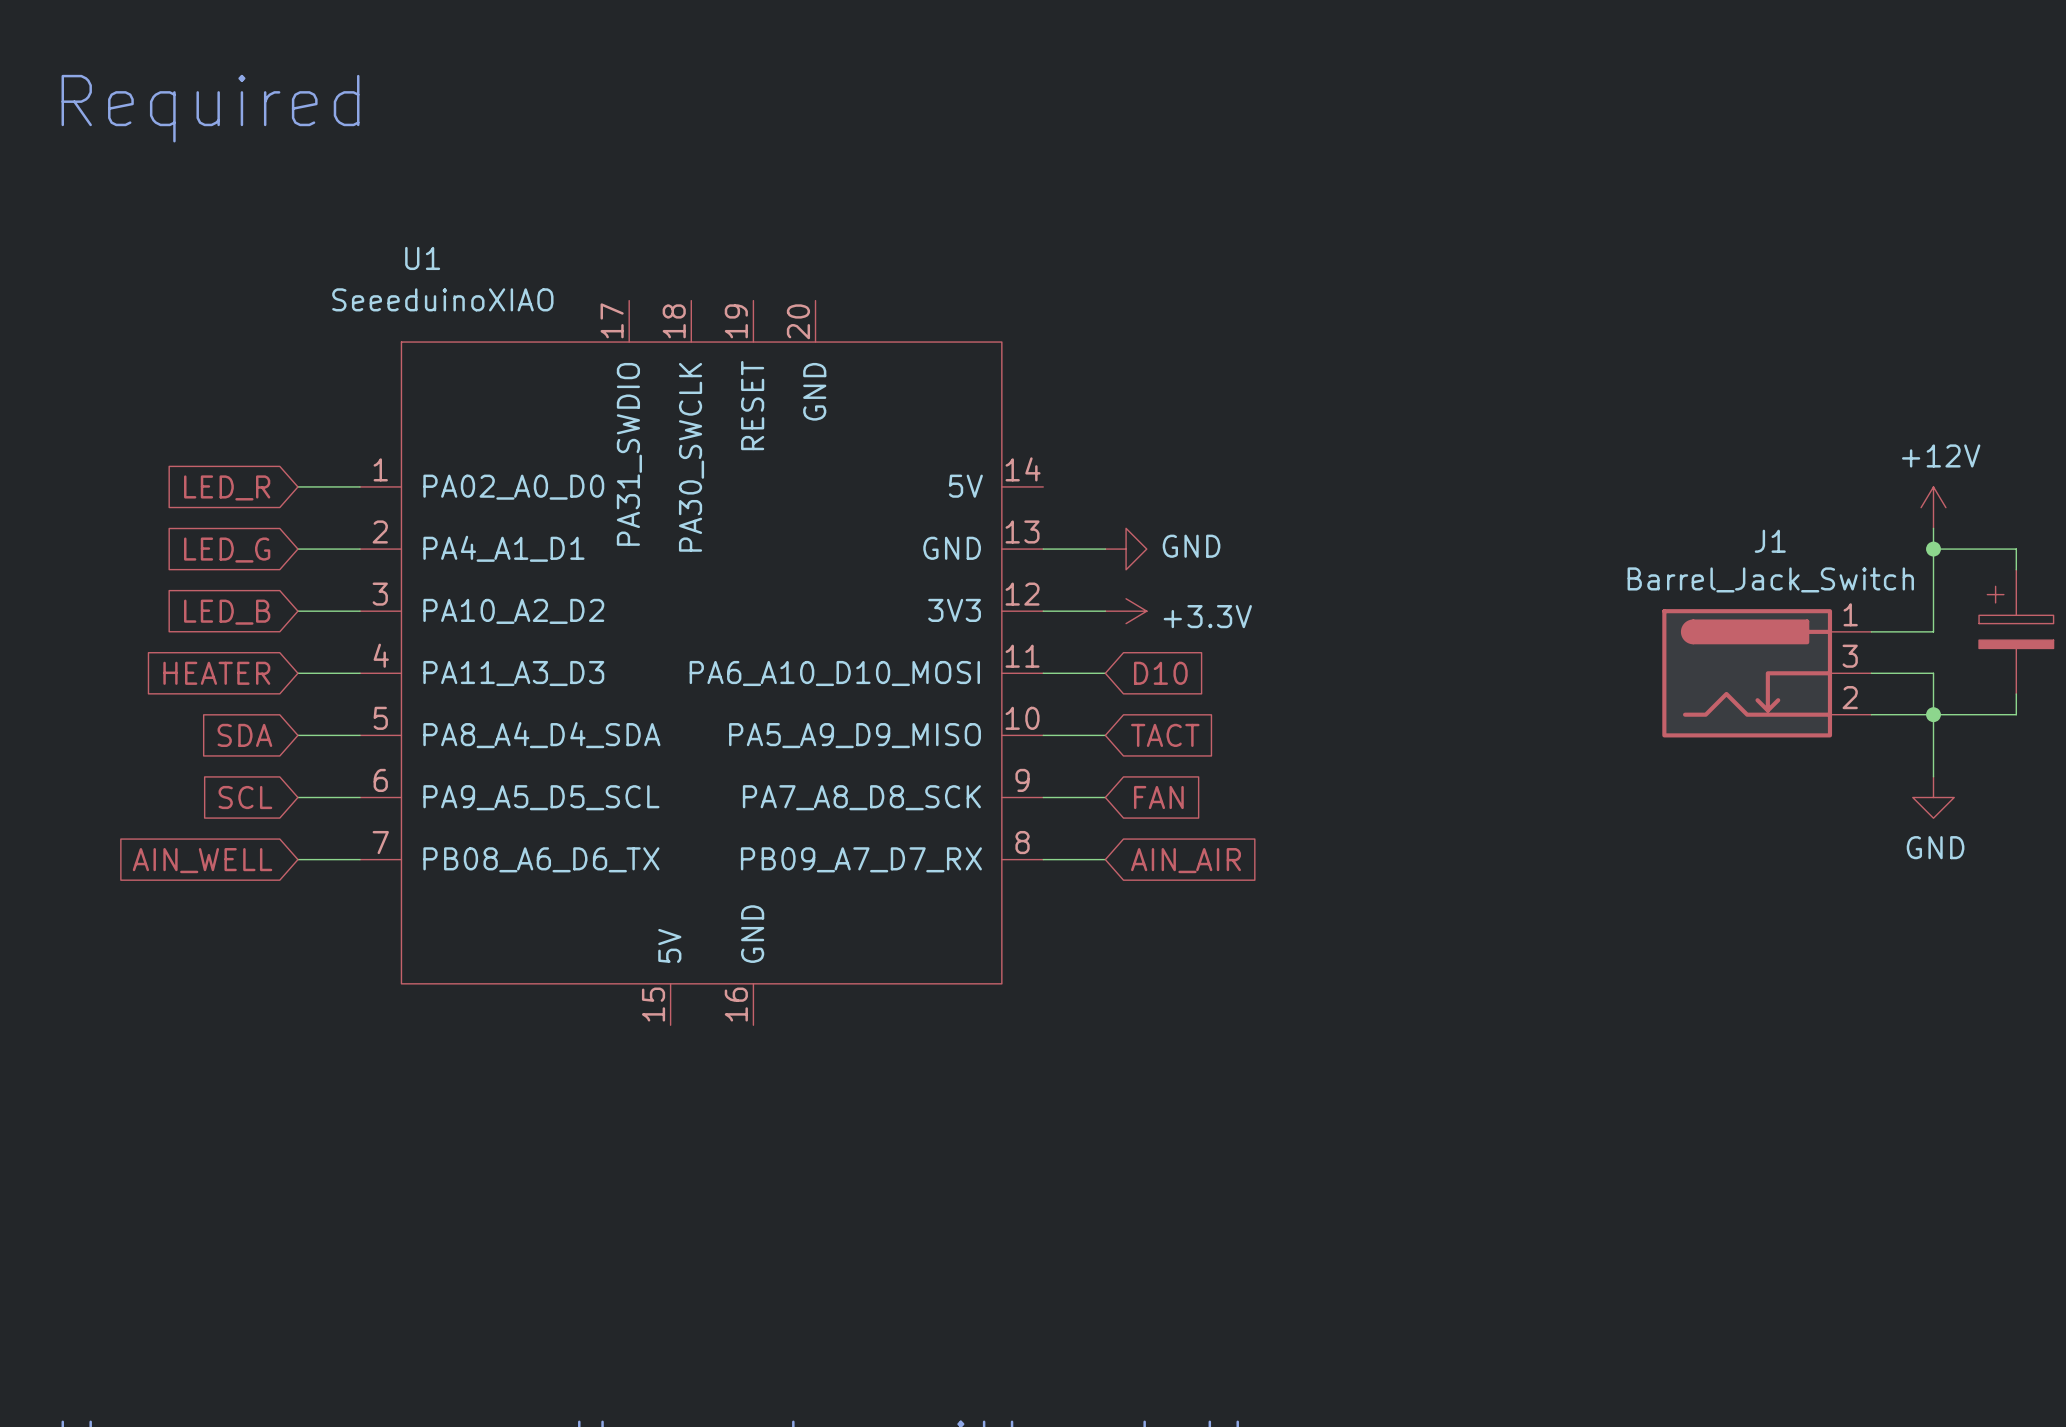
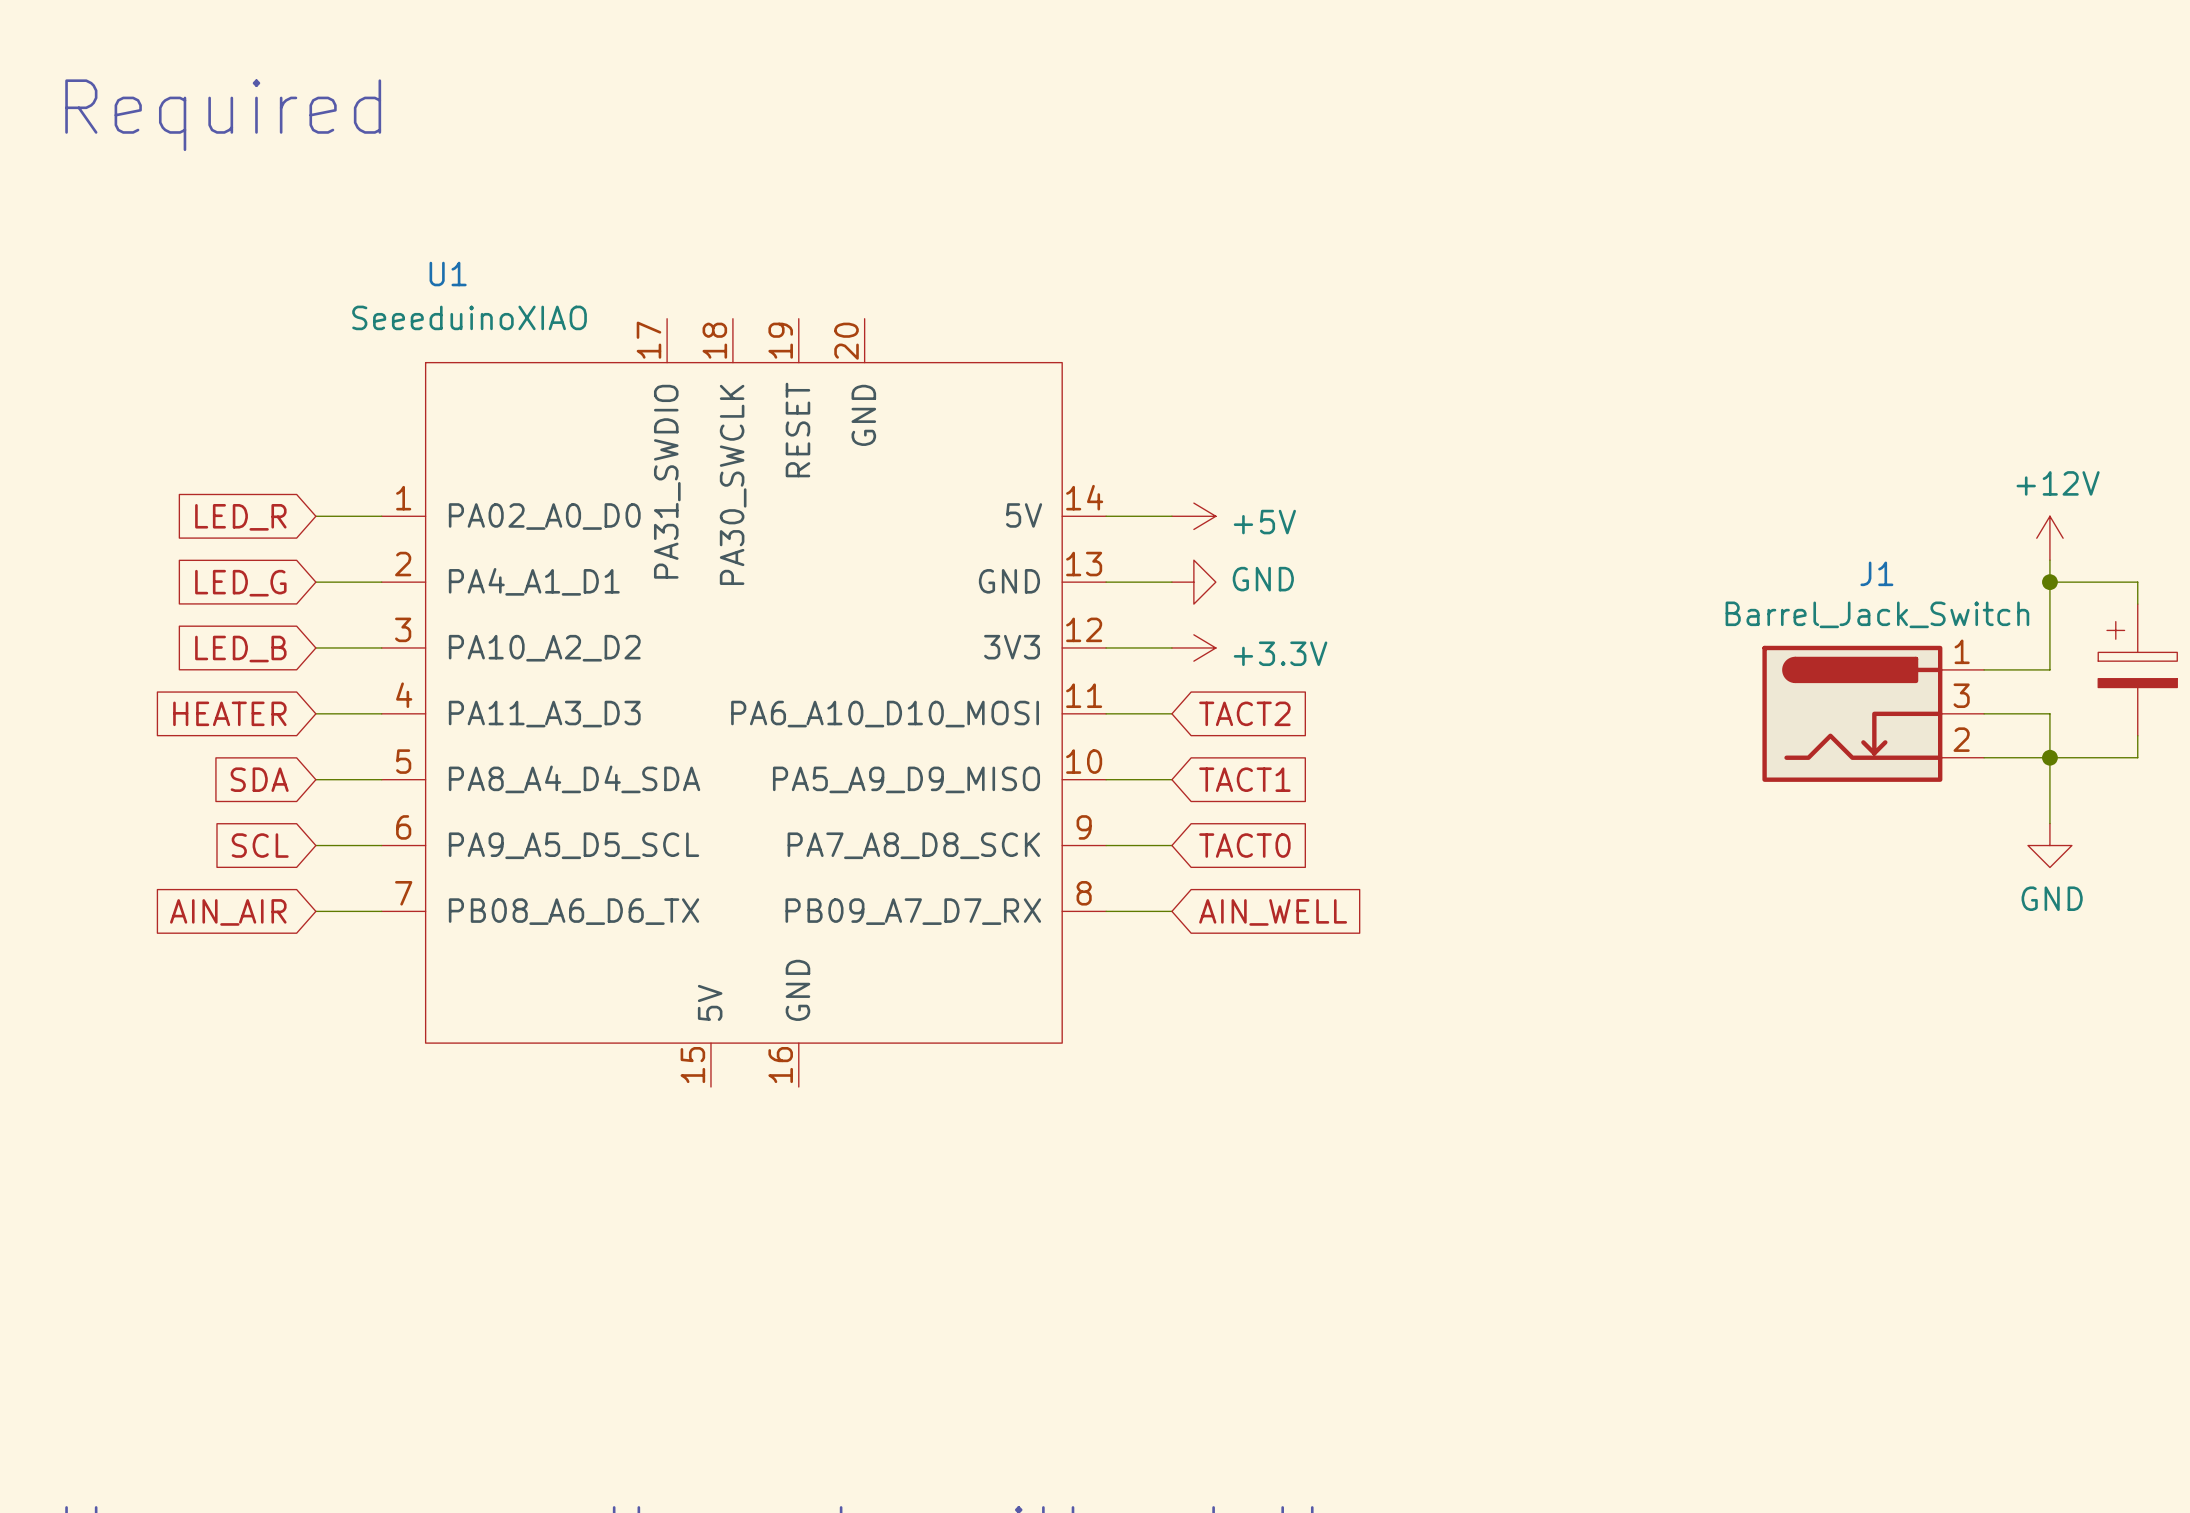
wire: none -> (1106, 516) (1171, 516)
power symbol: none -> +5V (1193, 516)
global label: D10 (1160, 673) -> TACT2 (1244, 713)
global label: TACT (1165, 735) -> TACT1 (1244, 779)
global label: FAN (1158, 797) -> TACT0 (1244, 845)
global label: AIN_WELL (202, 860) -> AIN_AIR (228, 912)
global label: AIN_AIR (1185, 860) -> AIN_WELL (1273, 912)

